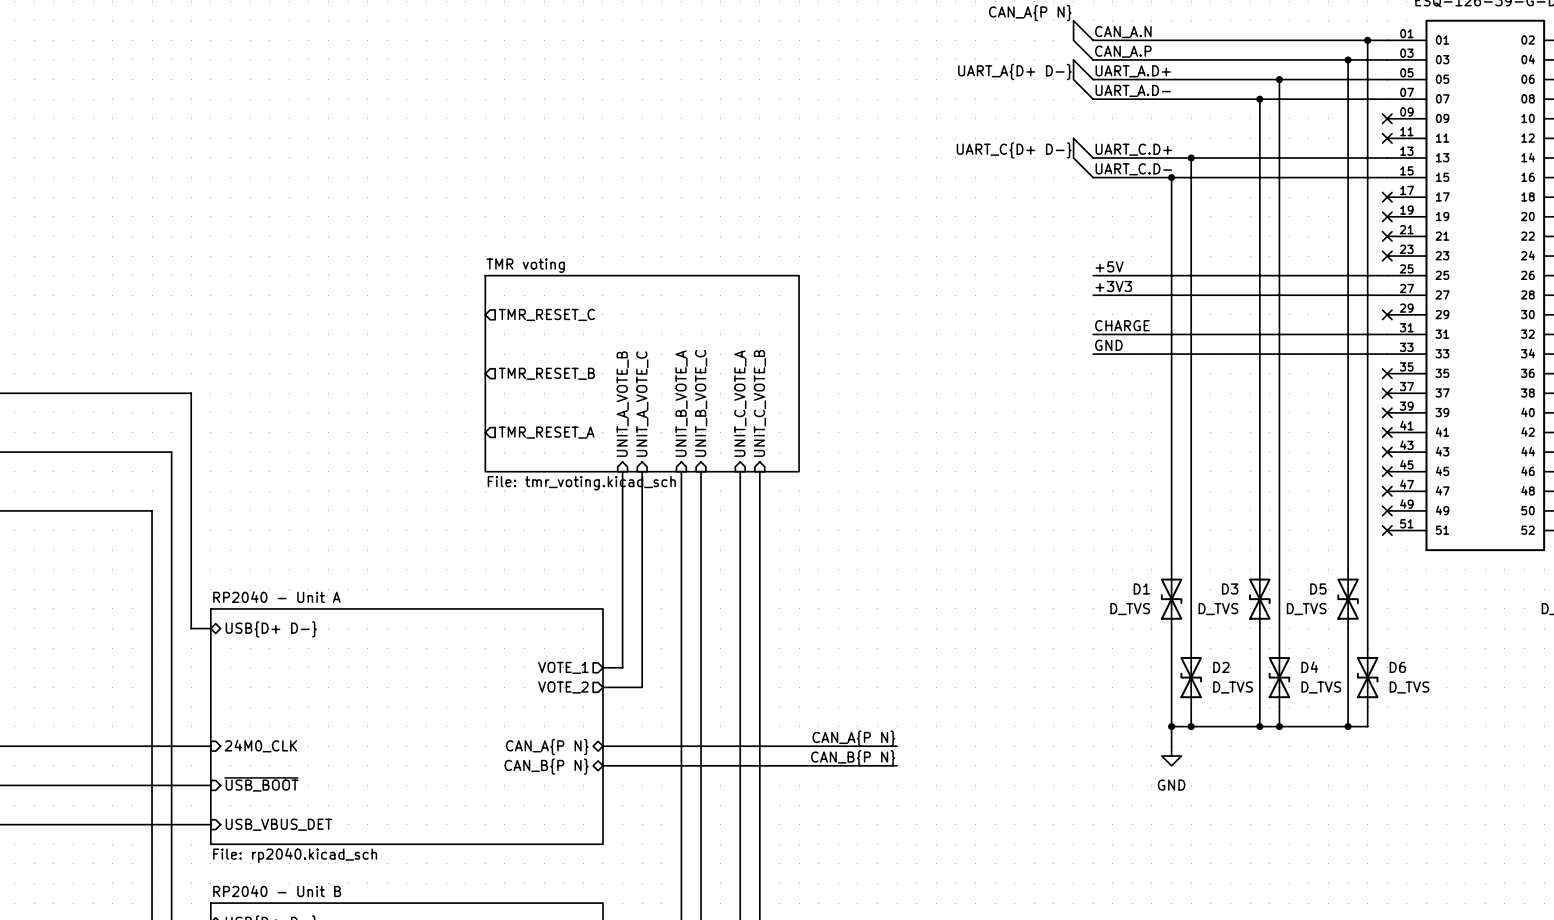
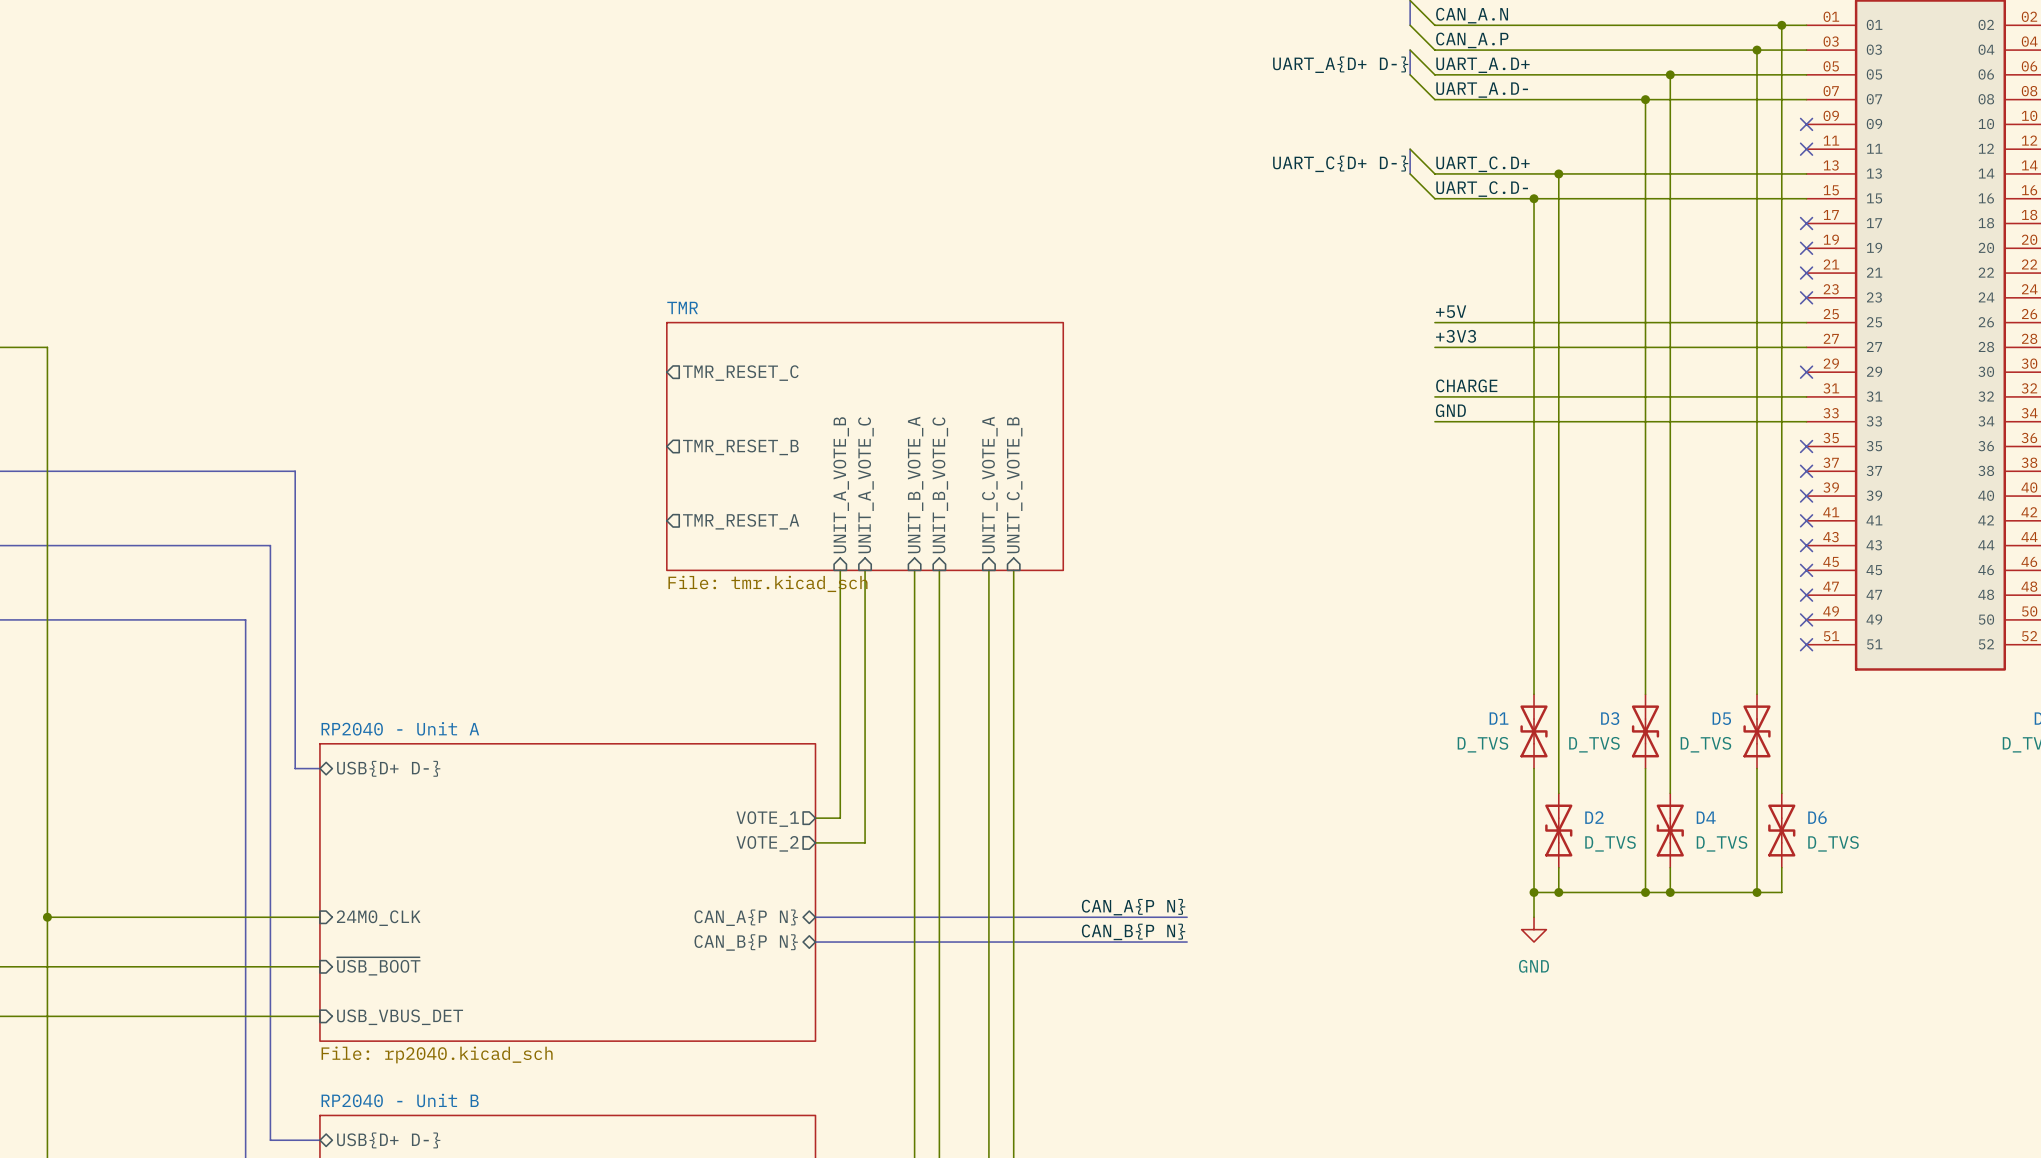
sheet TMR voting name: TMR voting (525, 265) -> TMR (682, 307)
sheet TMR voting value: File: tmr_voting.kicad_sch (581, 483) -> File: tmr.kicad_sch (767, 583)

